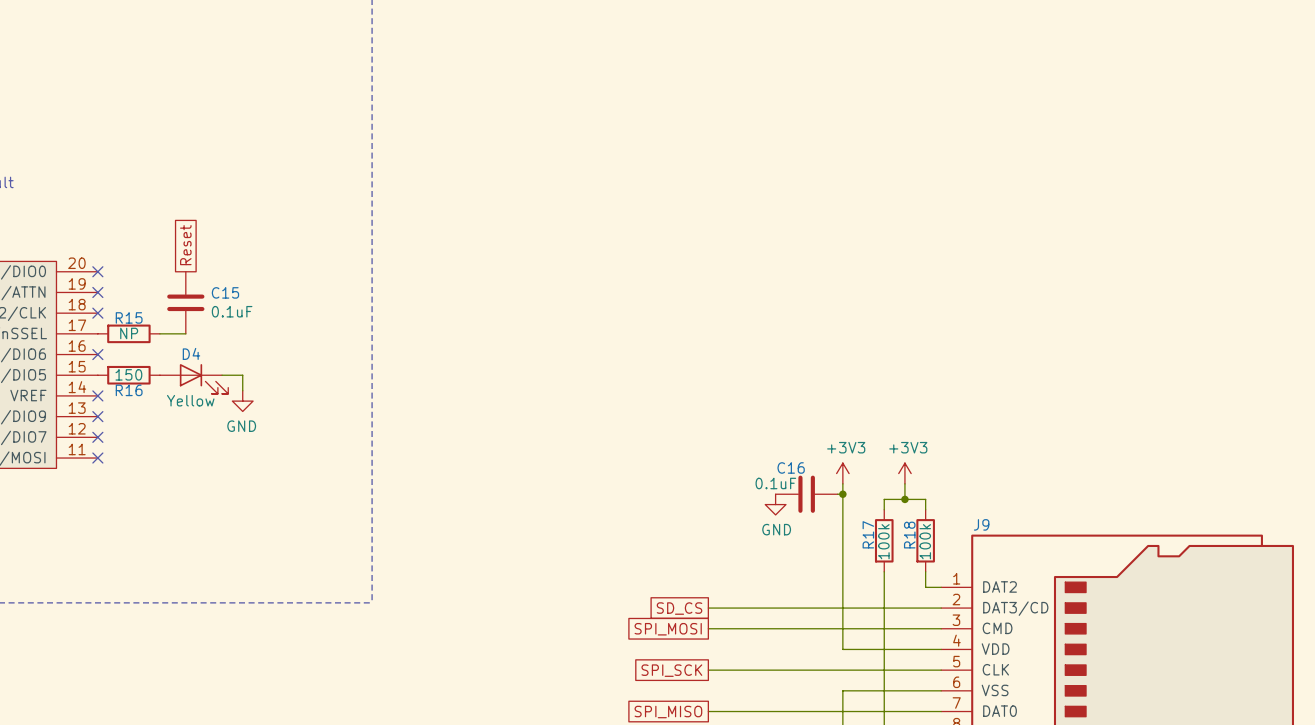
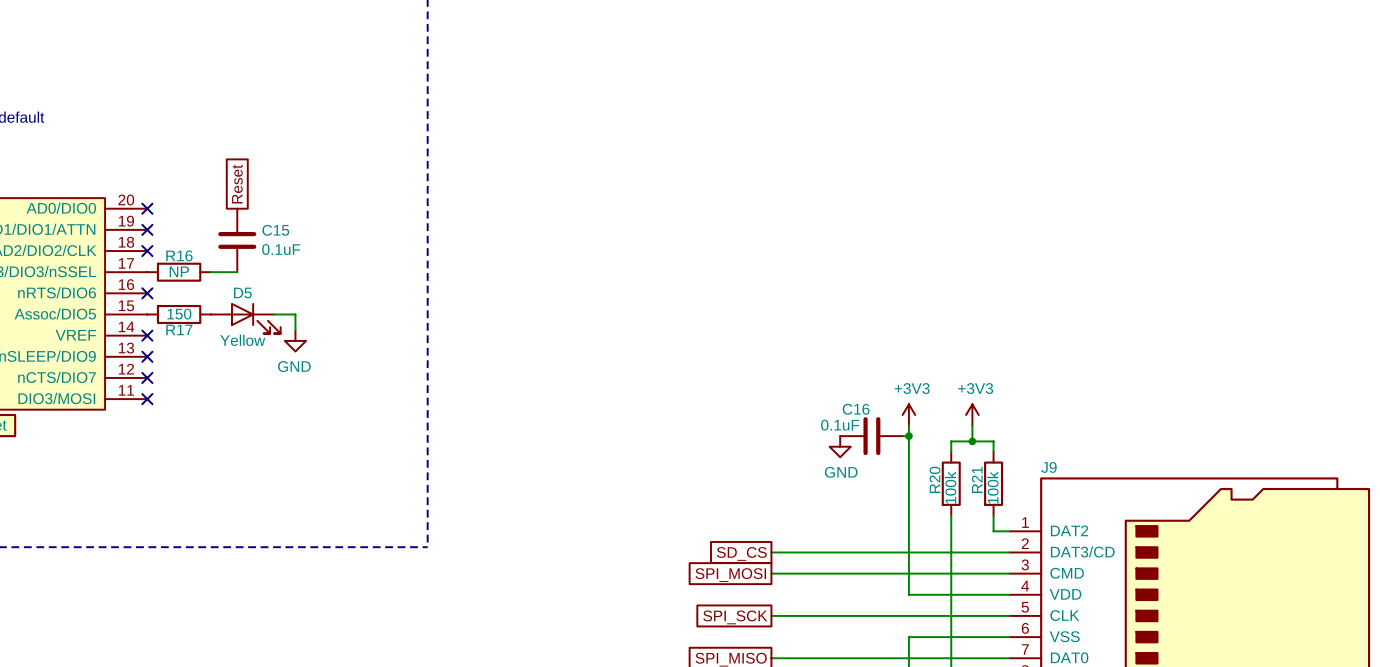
R15 name: R15 (129, 317) -> R16 (179, 255)
D4 name: D4 (191, 353) -> D5 (242, 293)
R16 name: R16 (129, 390) -> R17 (179, 329)
R17 name: R17 (868, 534) -> R20 (934, 479)
R18 name: R18 (909, 535) -> R21 (977, 479)

